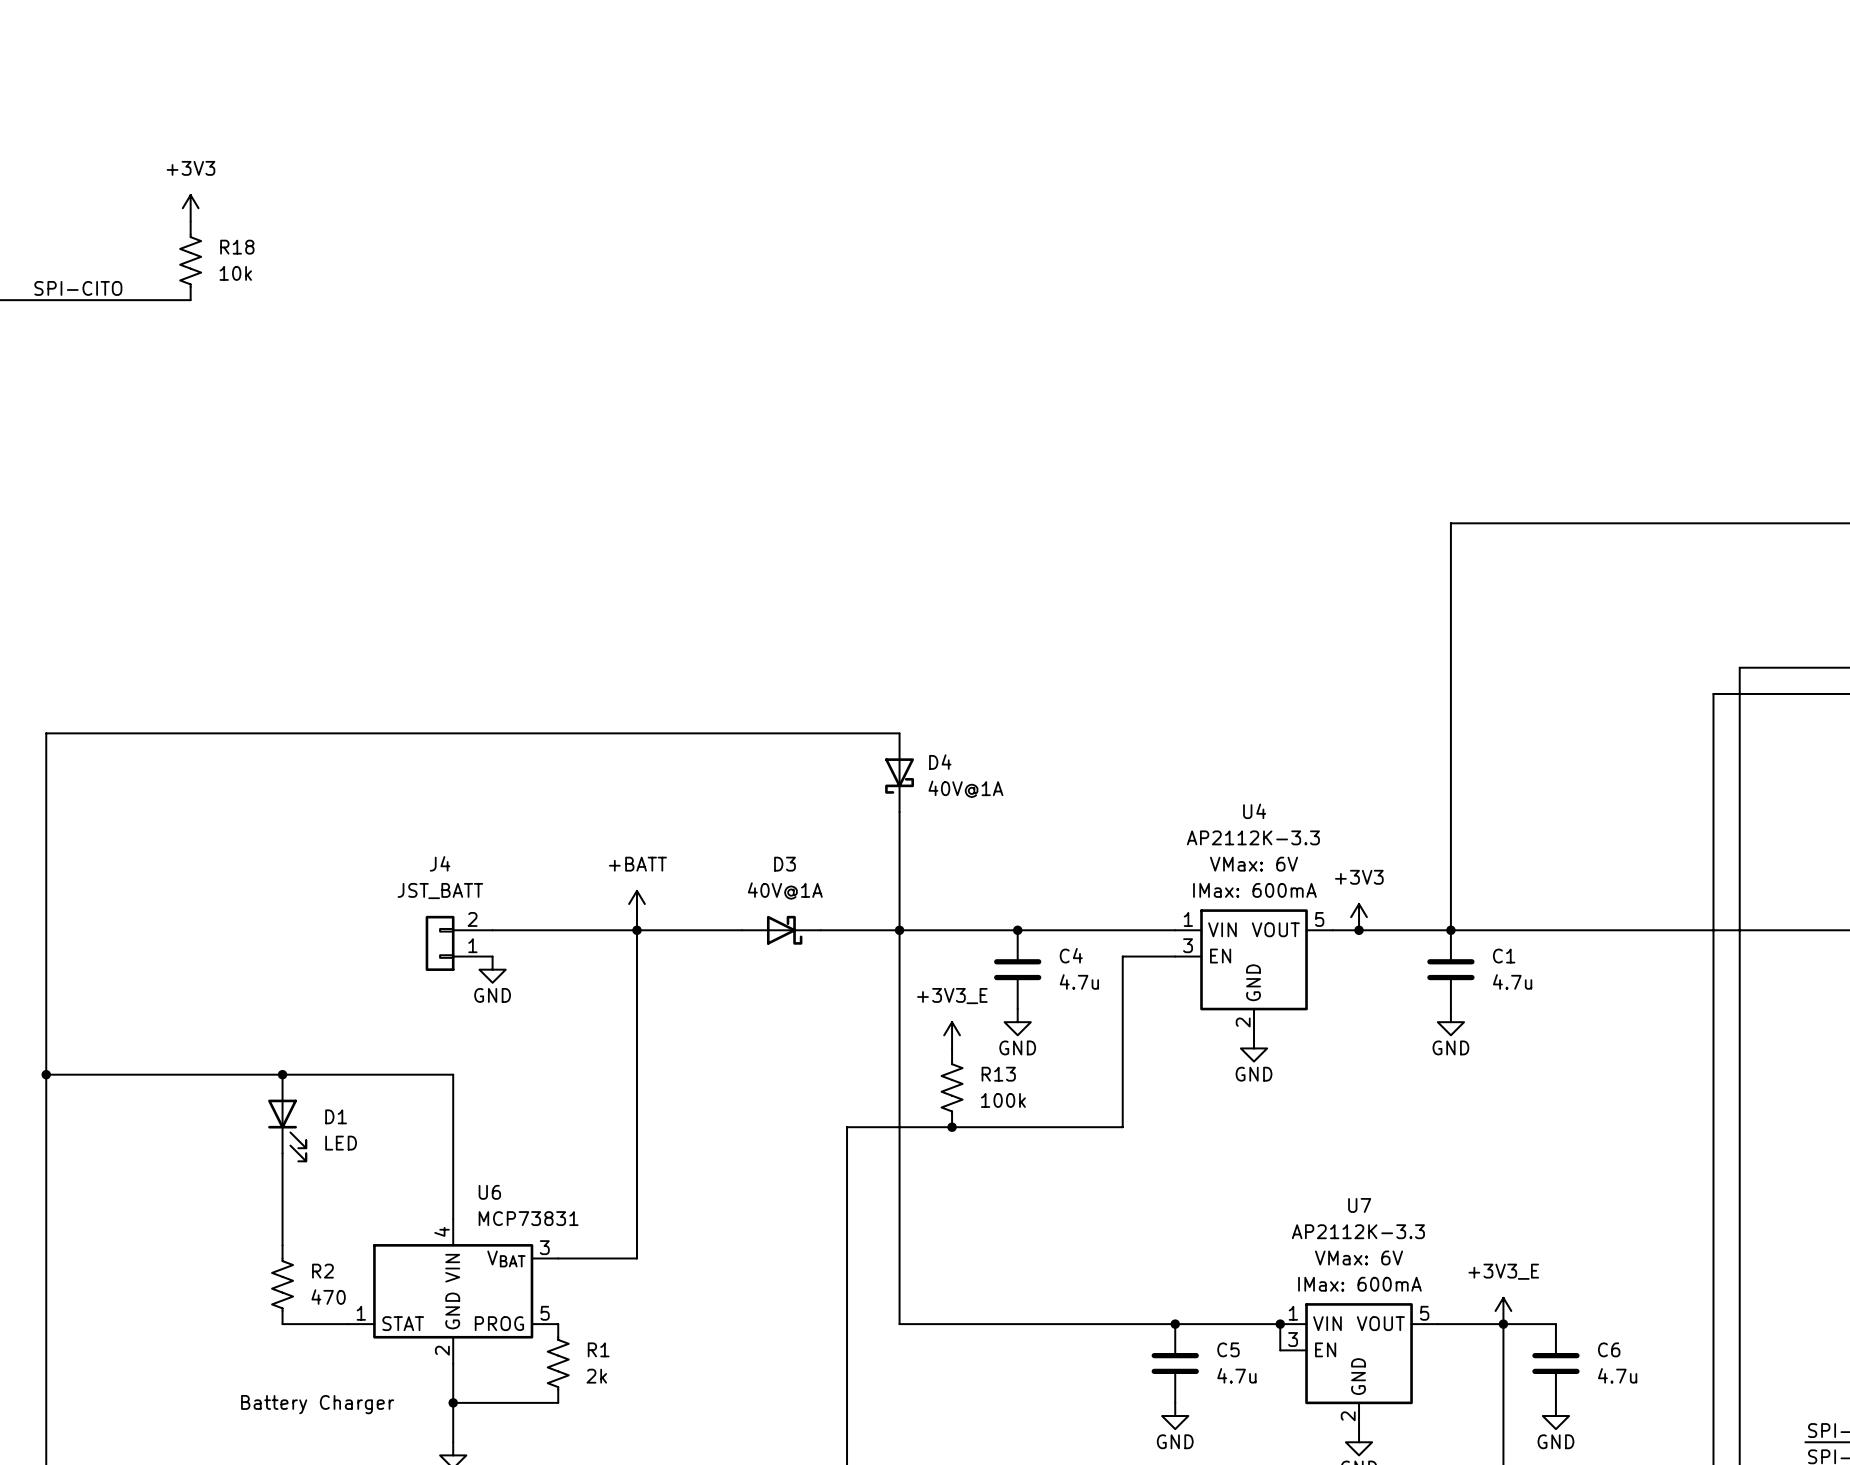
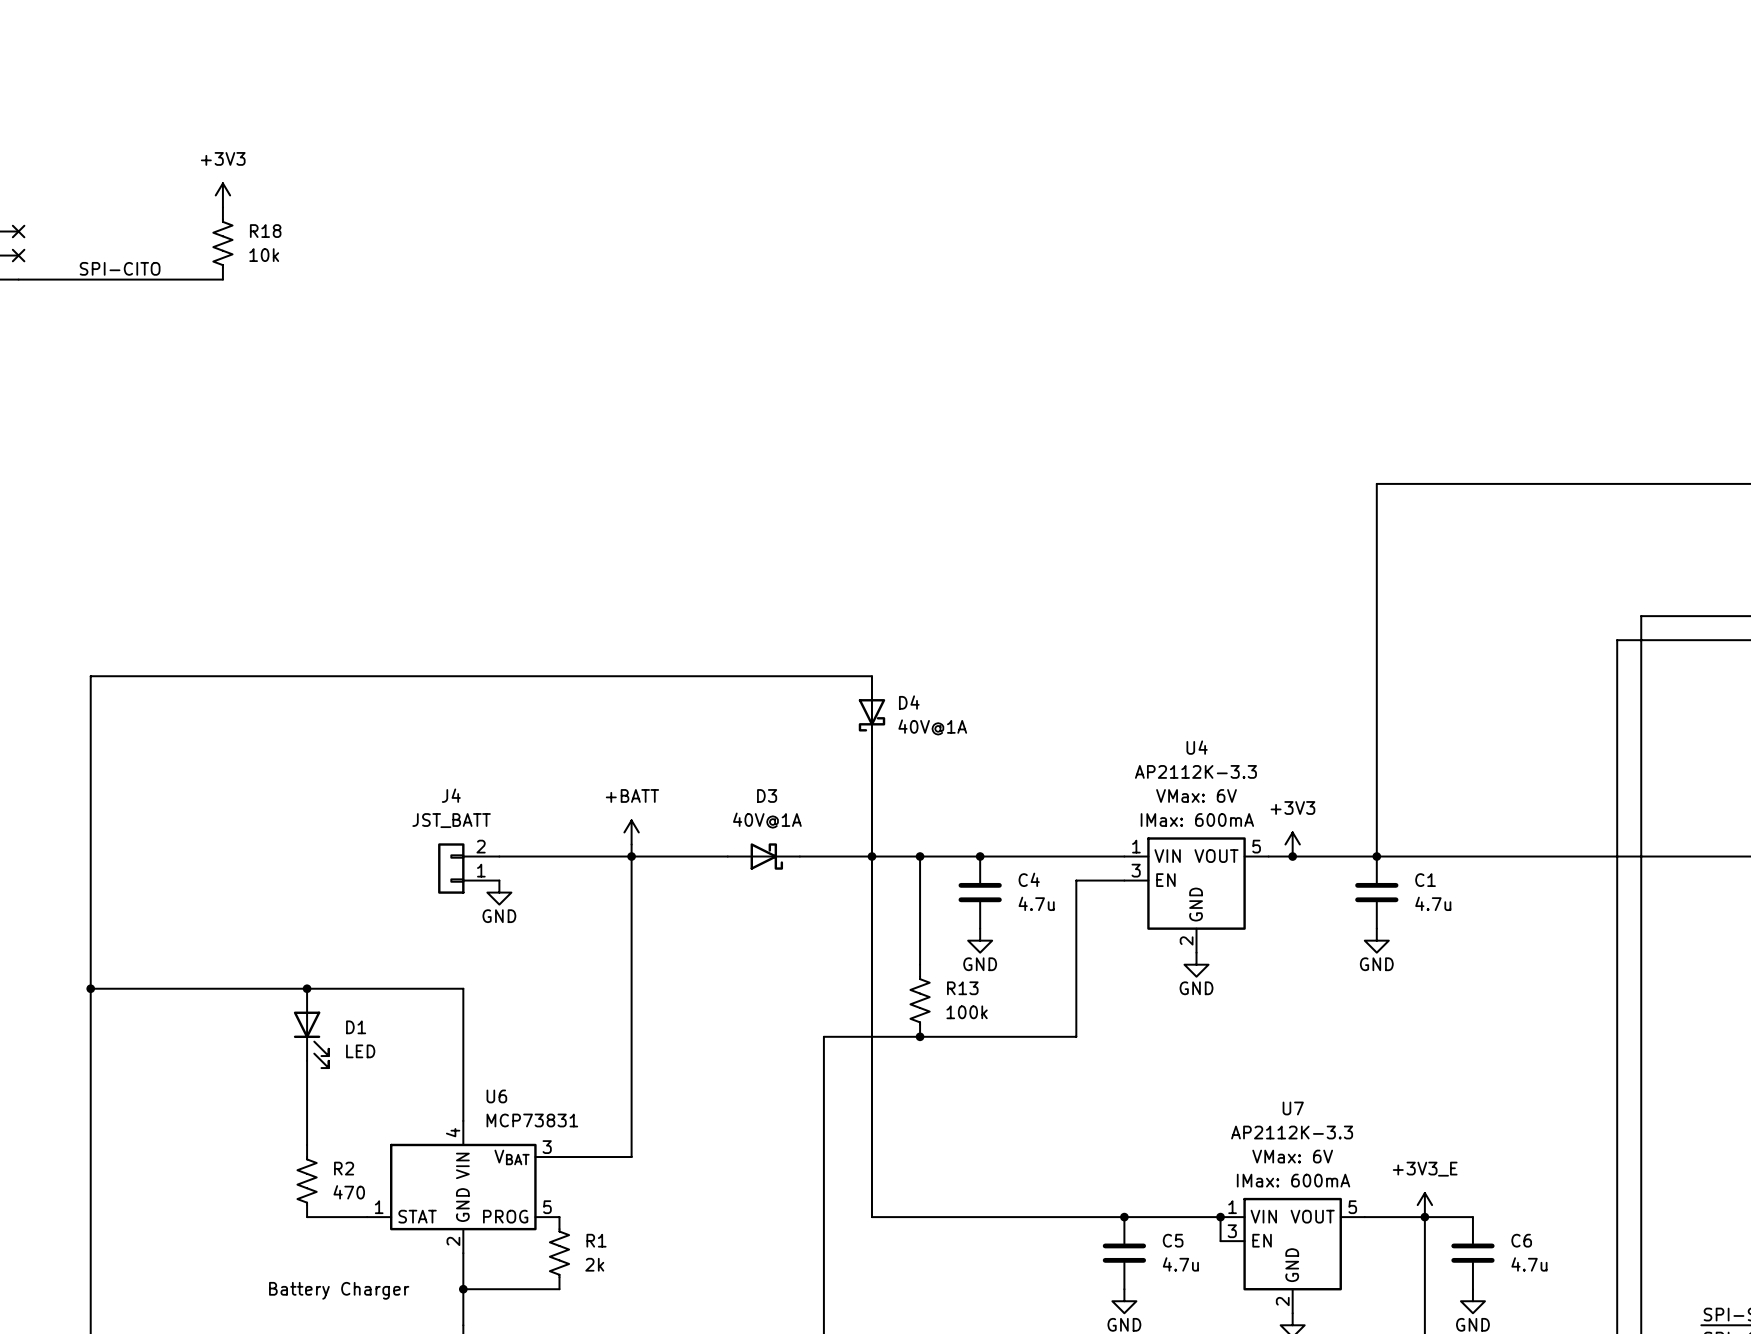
wire: none -> (920, 856) (920, 964)
junction: none -> (920, 856)
power symbol: +3V3_E (952, 1035) -> none

